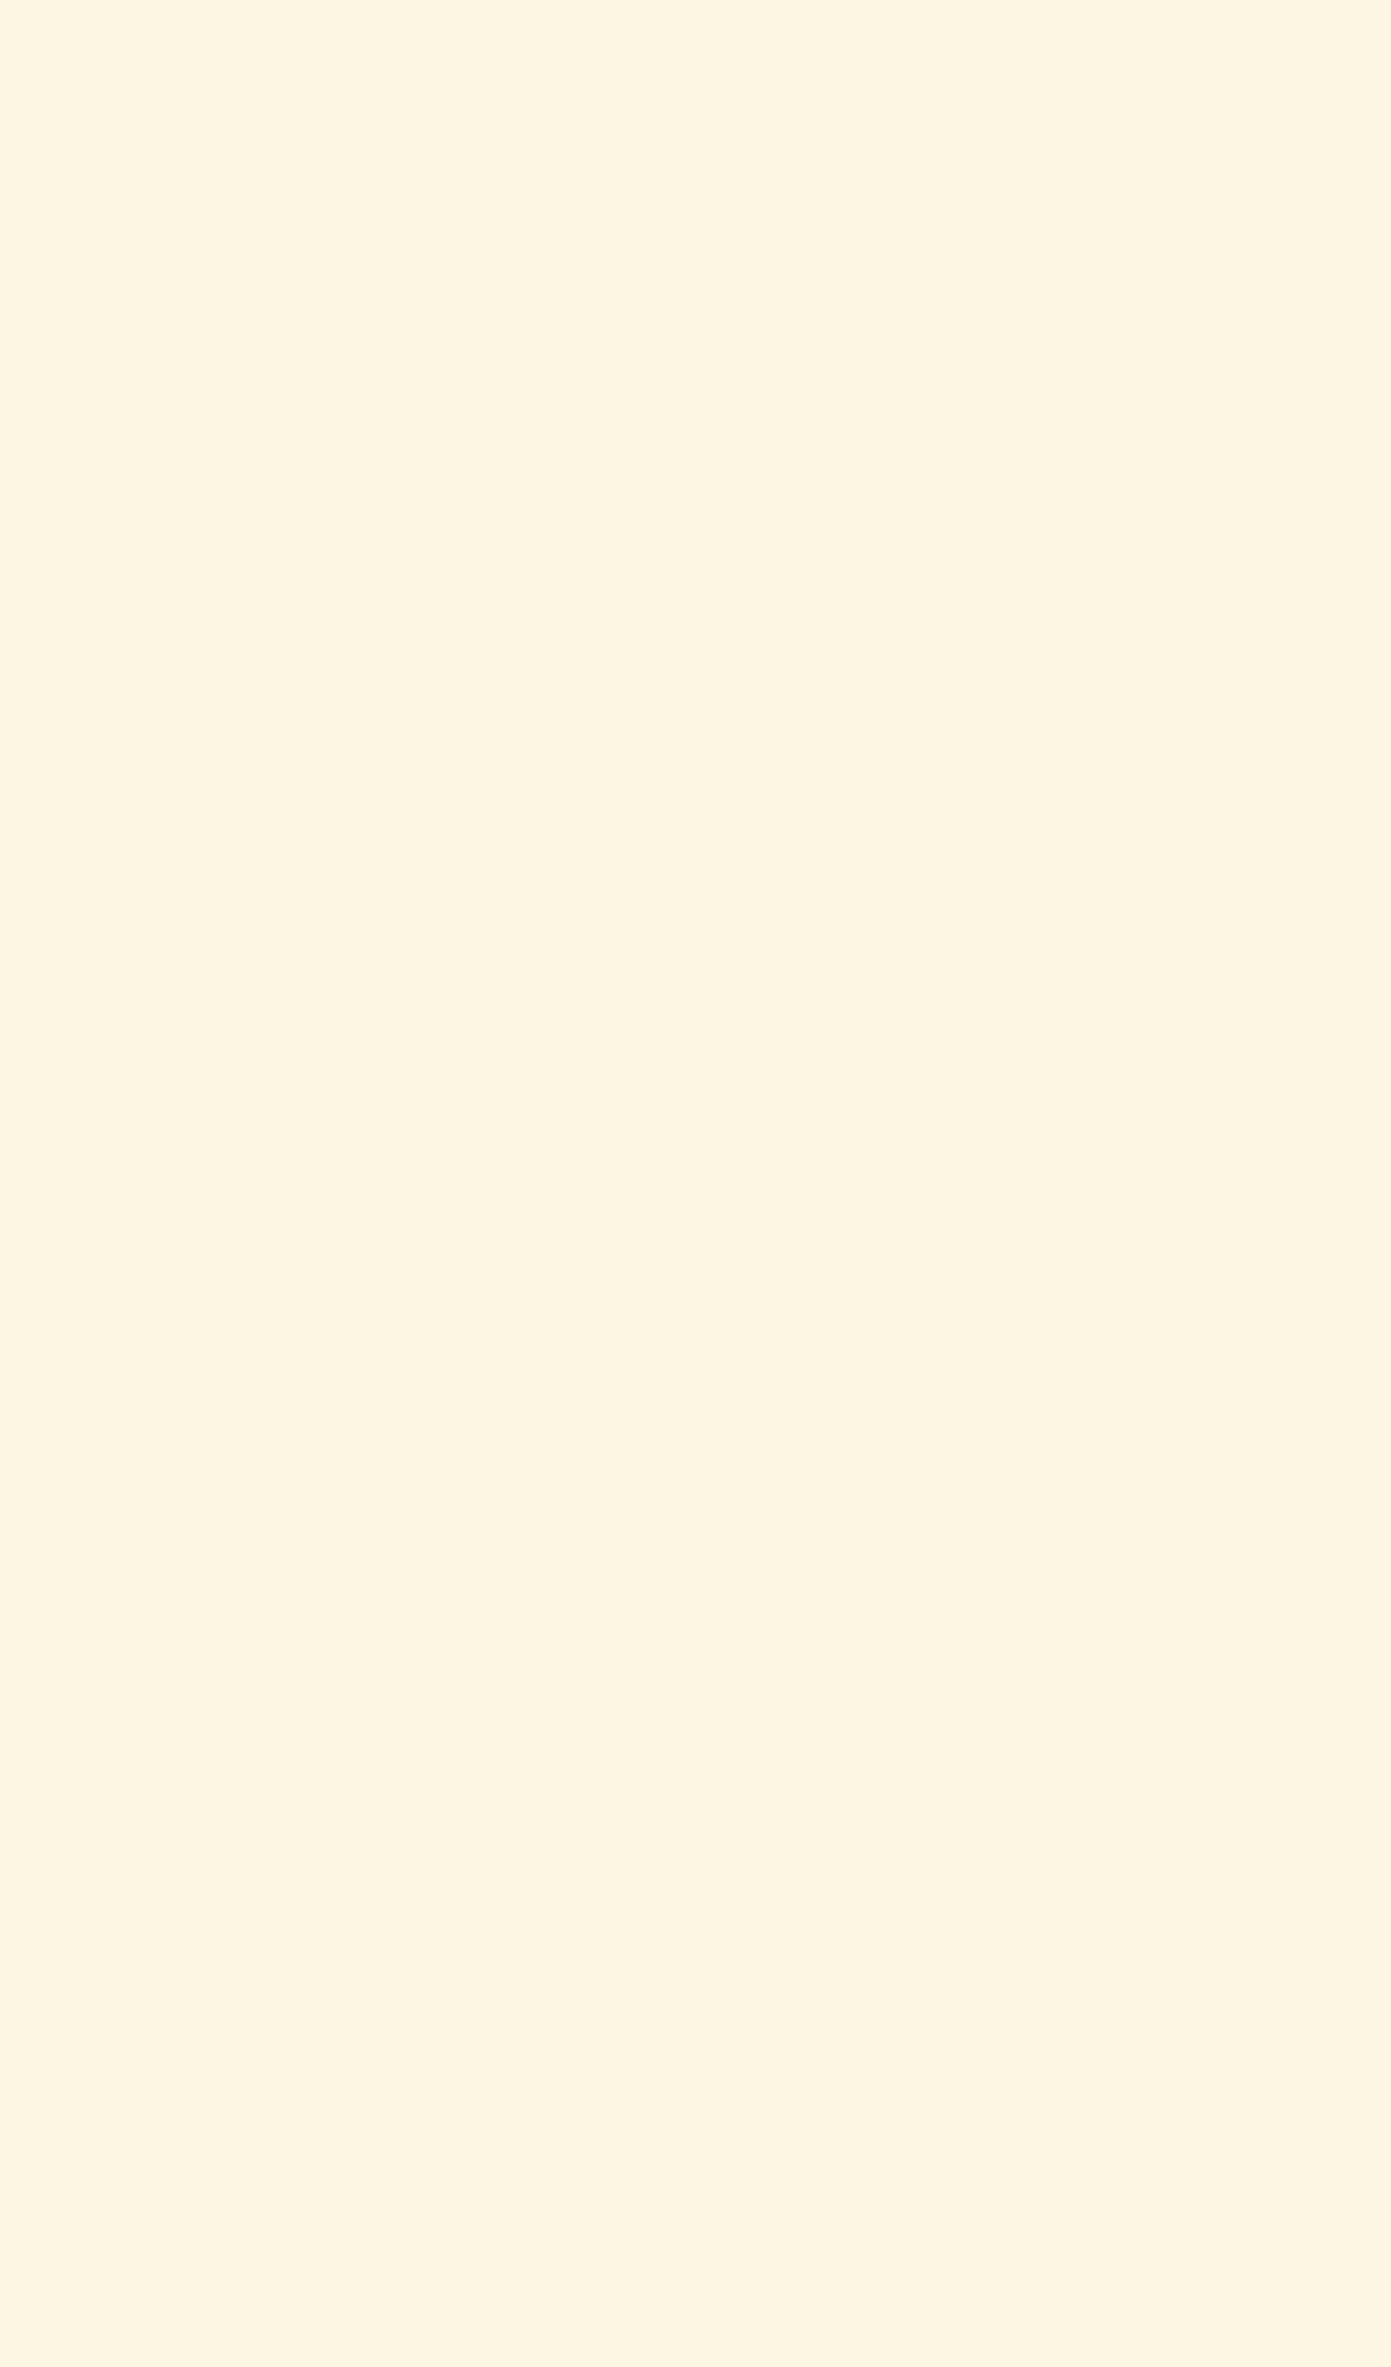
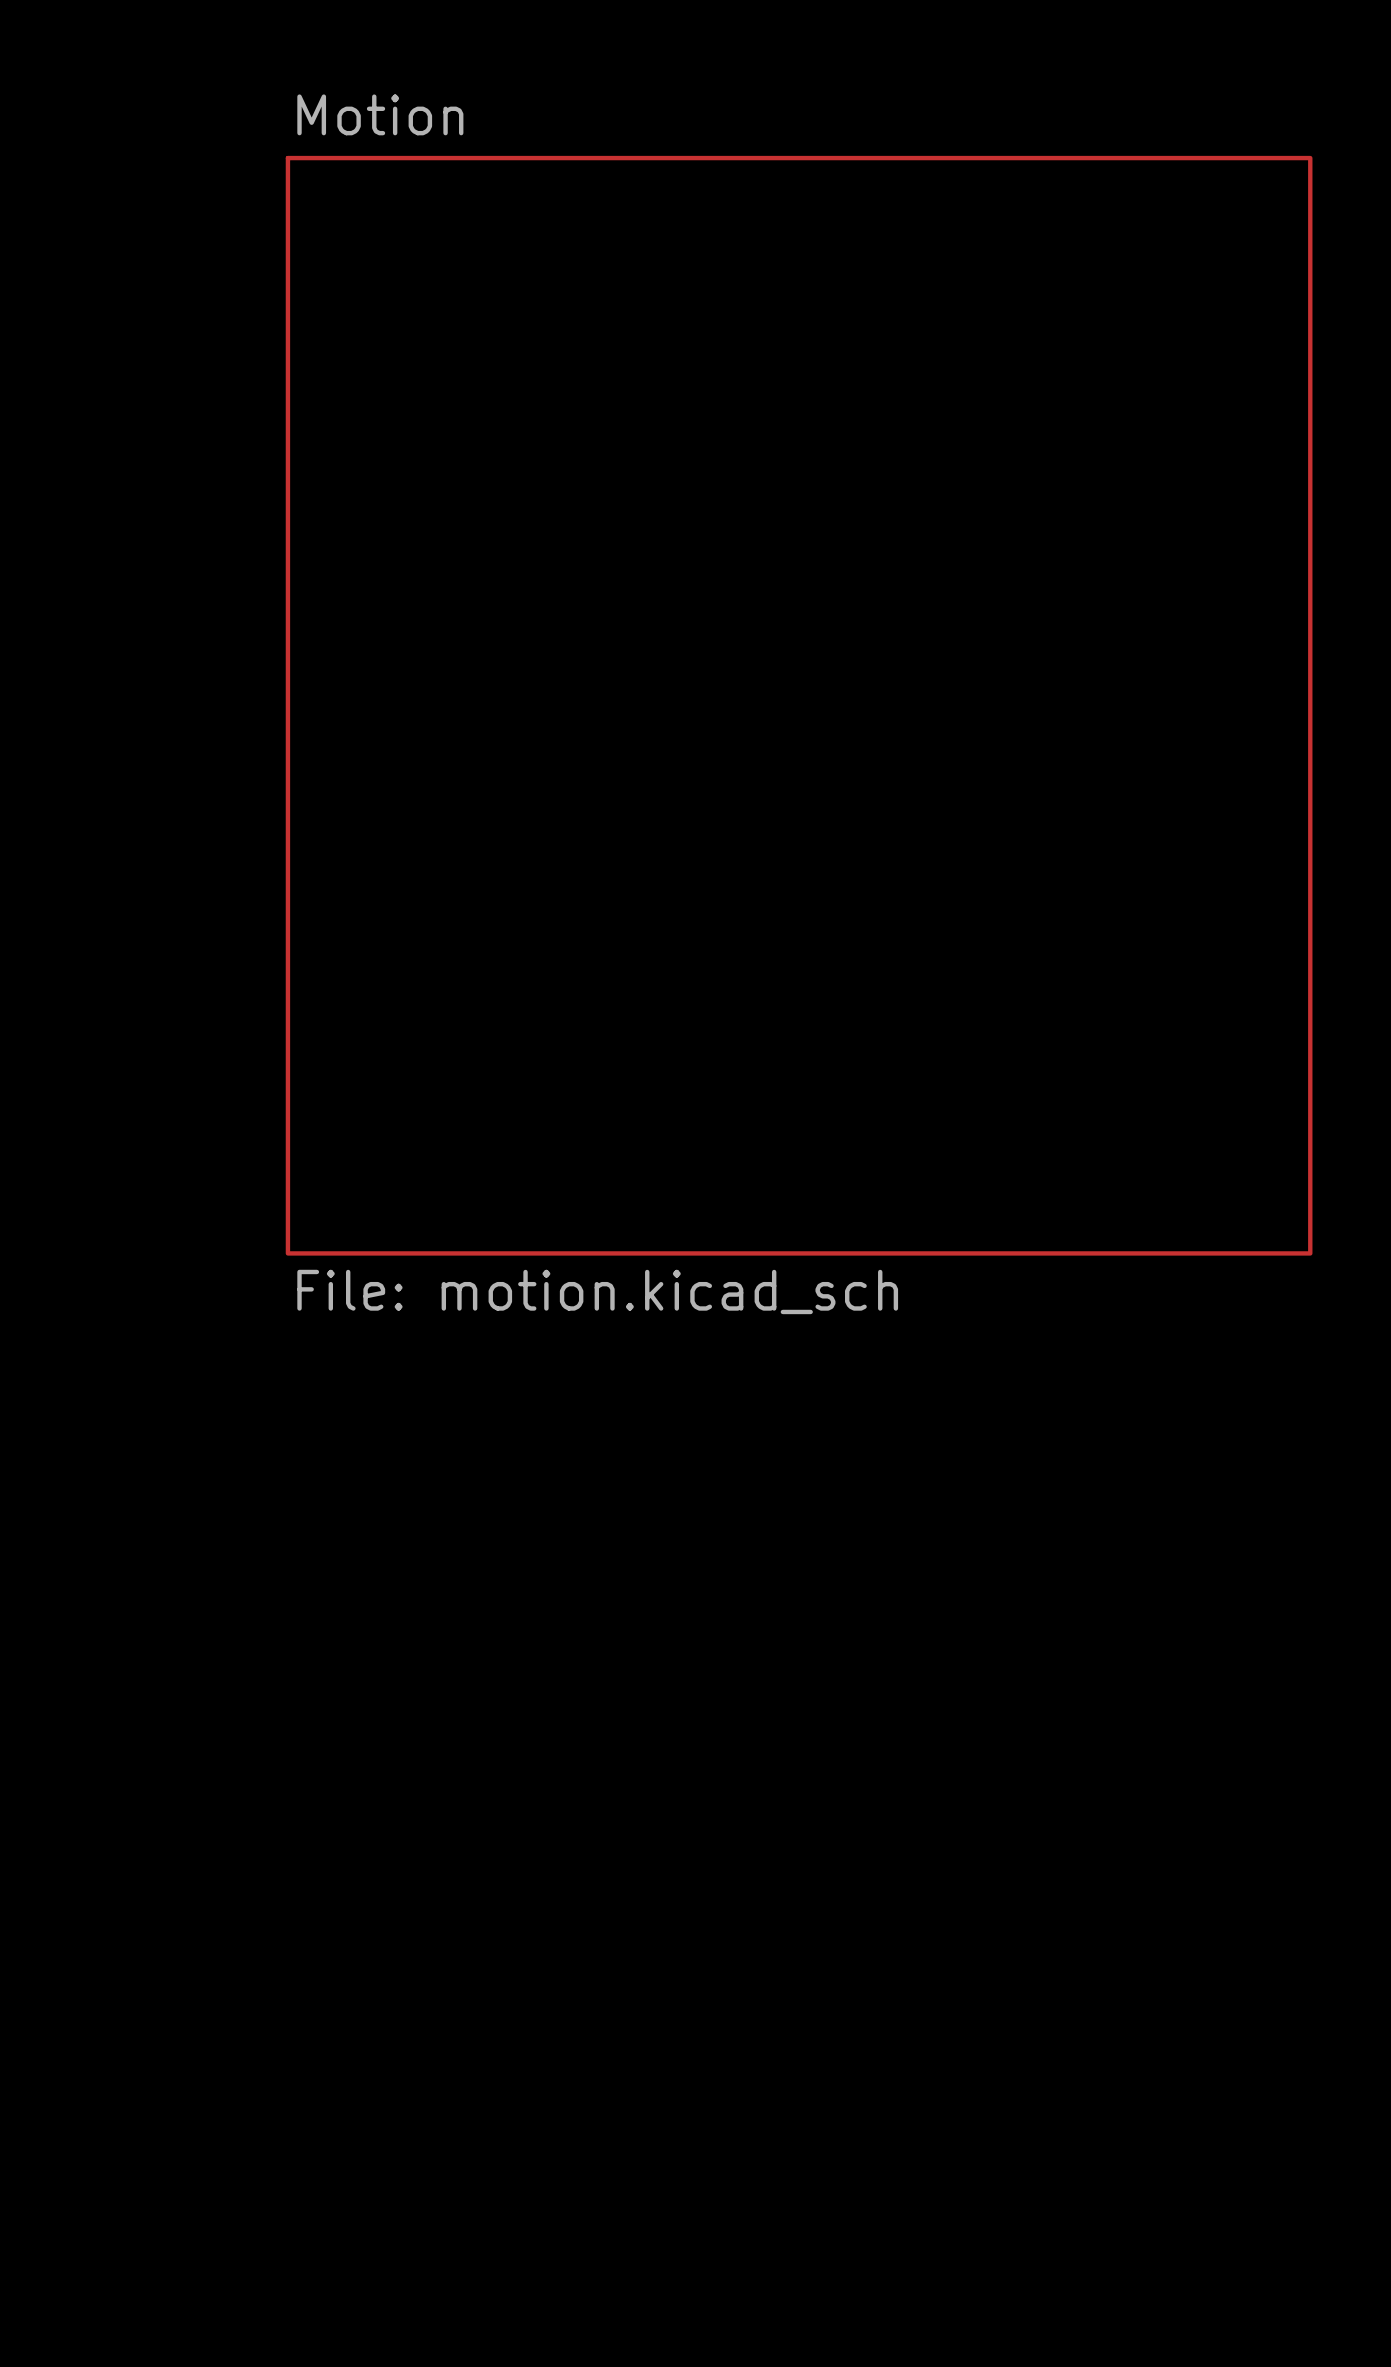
sheet Motion: none -> File: motion.kicad_sch (799, 705)

